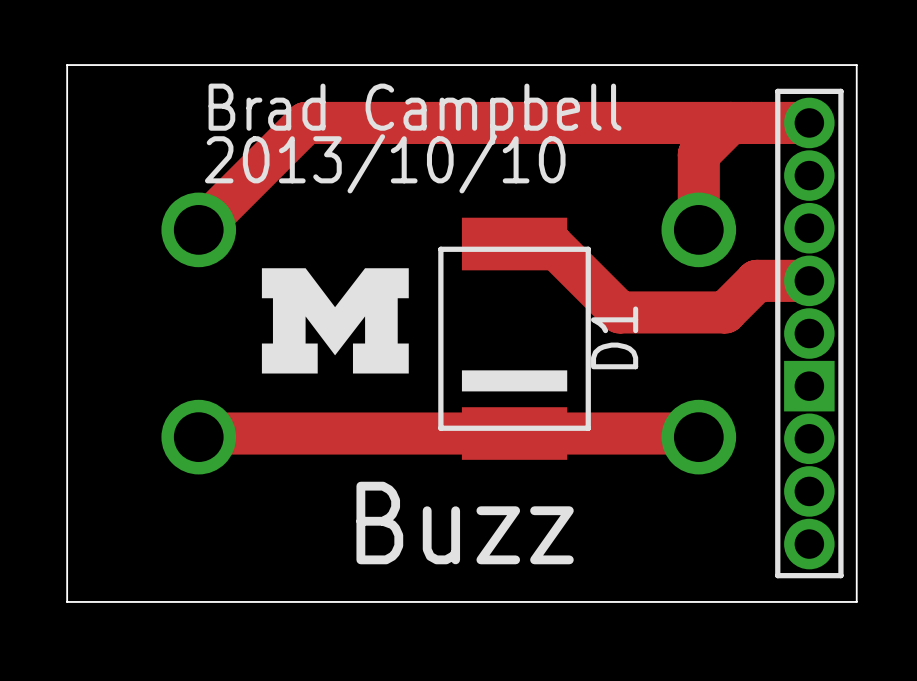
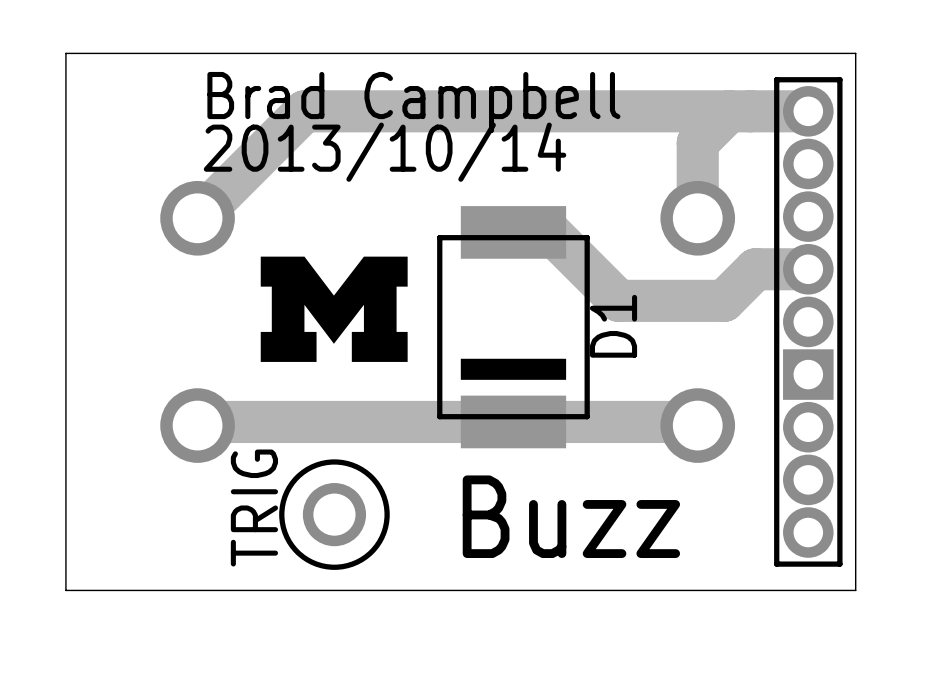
text: 2013/10/10 (385, 163) -> 2013/10/14 (385, 152)
text: none -> TRIG (254, 508)
text position: Buzz (465, 523) -> Buzz (571, 516)
part: none -> (334, 514)

